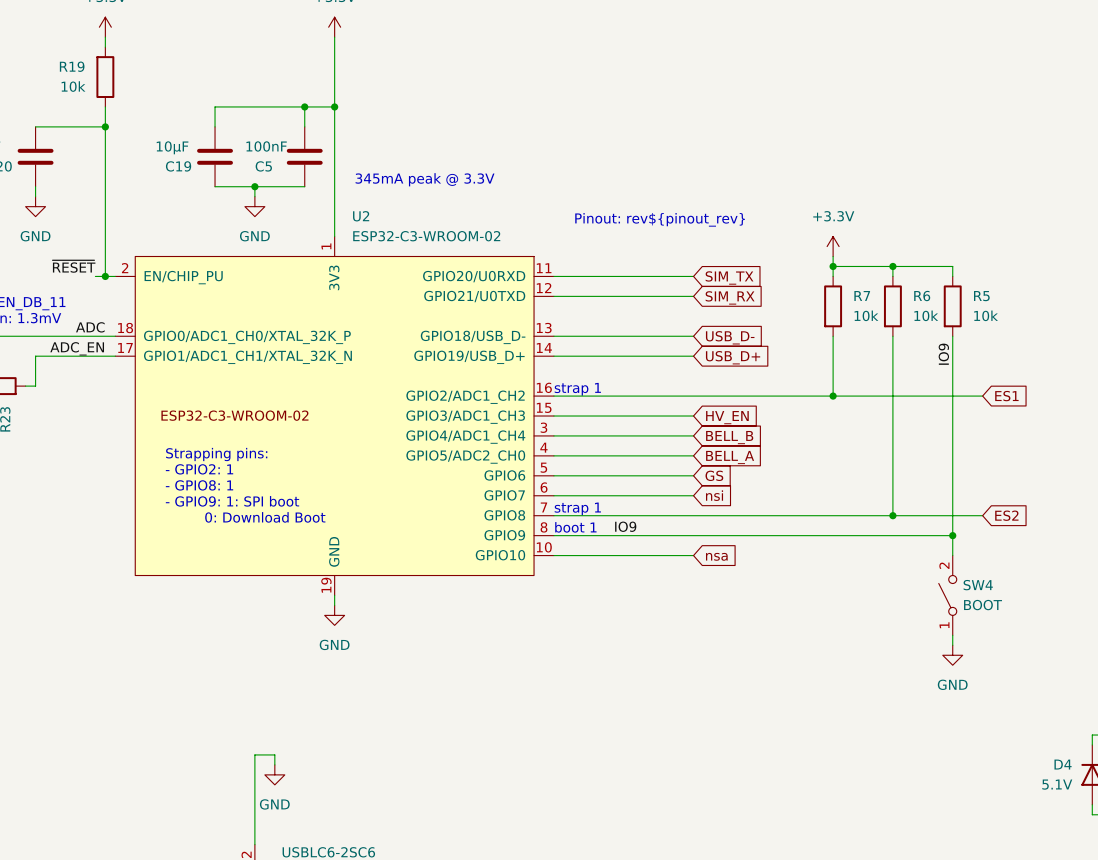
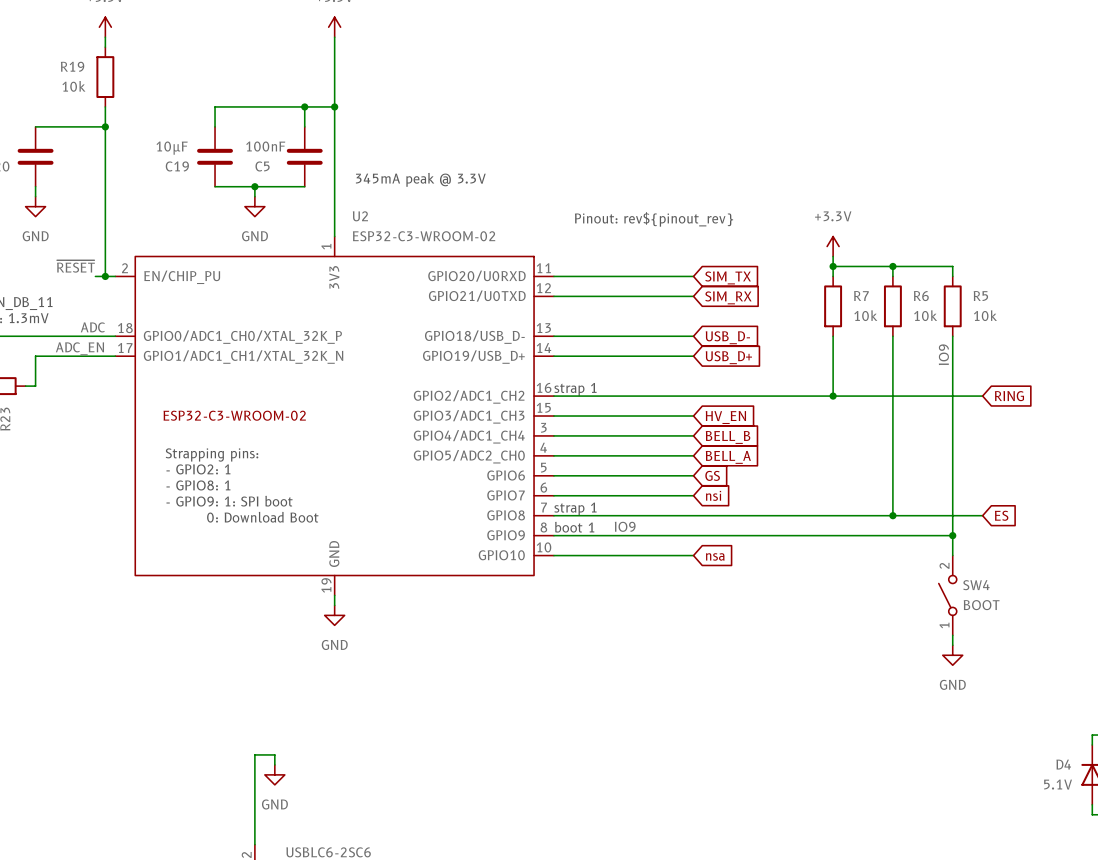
global label: ES1 (1006, 396) -> RING (1009, 396)
global label: ES2 (1006, 515) -> ES (1001, 515)

